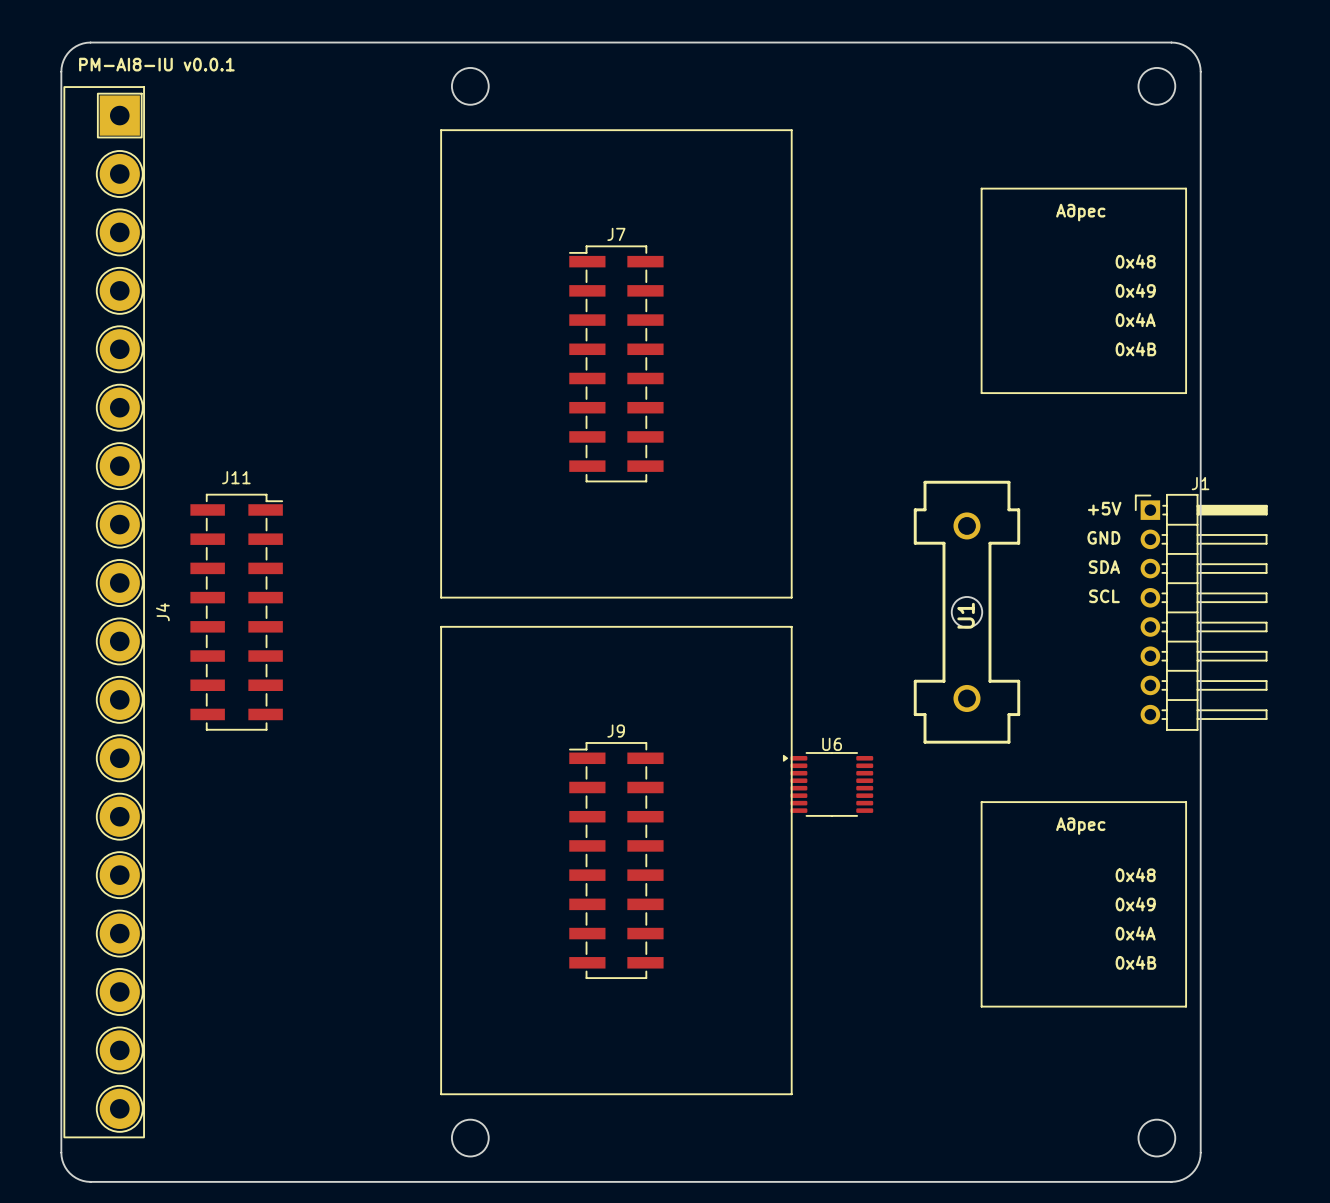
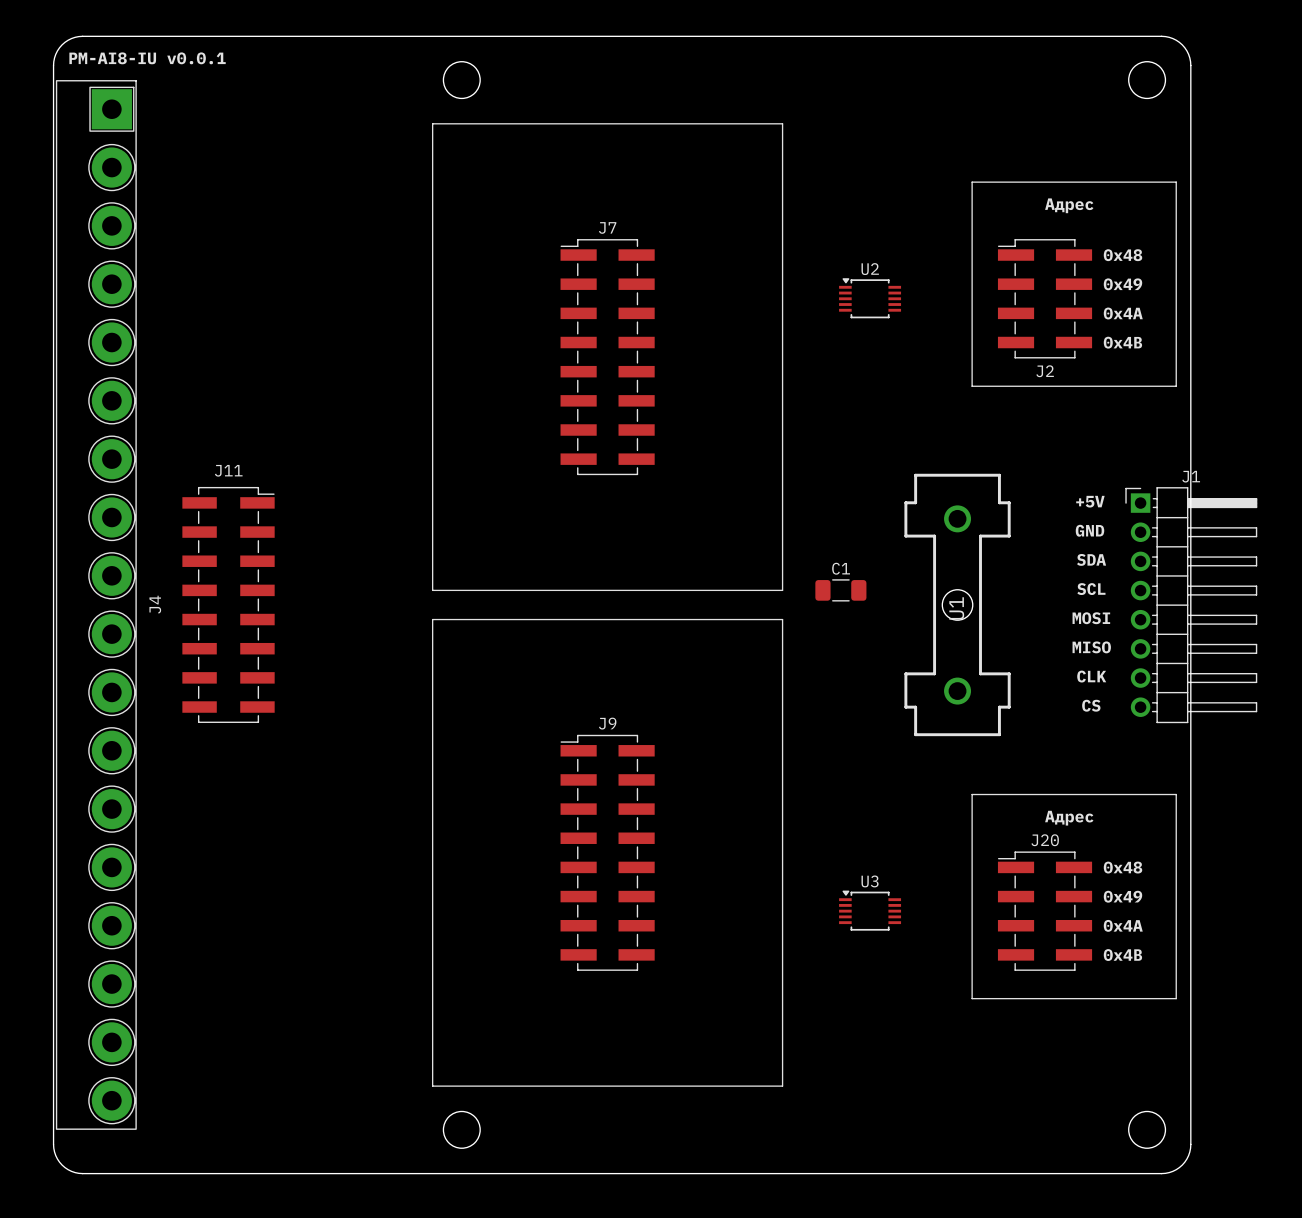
U2: none -> (870, 298)
J2: none -> (1045, 298)
C1: none -> (840, 590)
text: none -> MOSI (1091, 618)
text: none -> MISO (1091, 647)
text: none -> CLK (1091, 676)
text: none -> CS (1091, 705)
U6: (828, 784) -> none
U3: none -> (870, 910)
J20: none -> (1045, 911)

